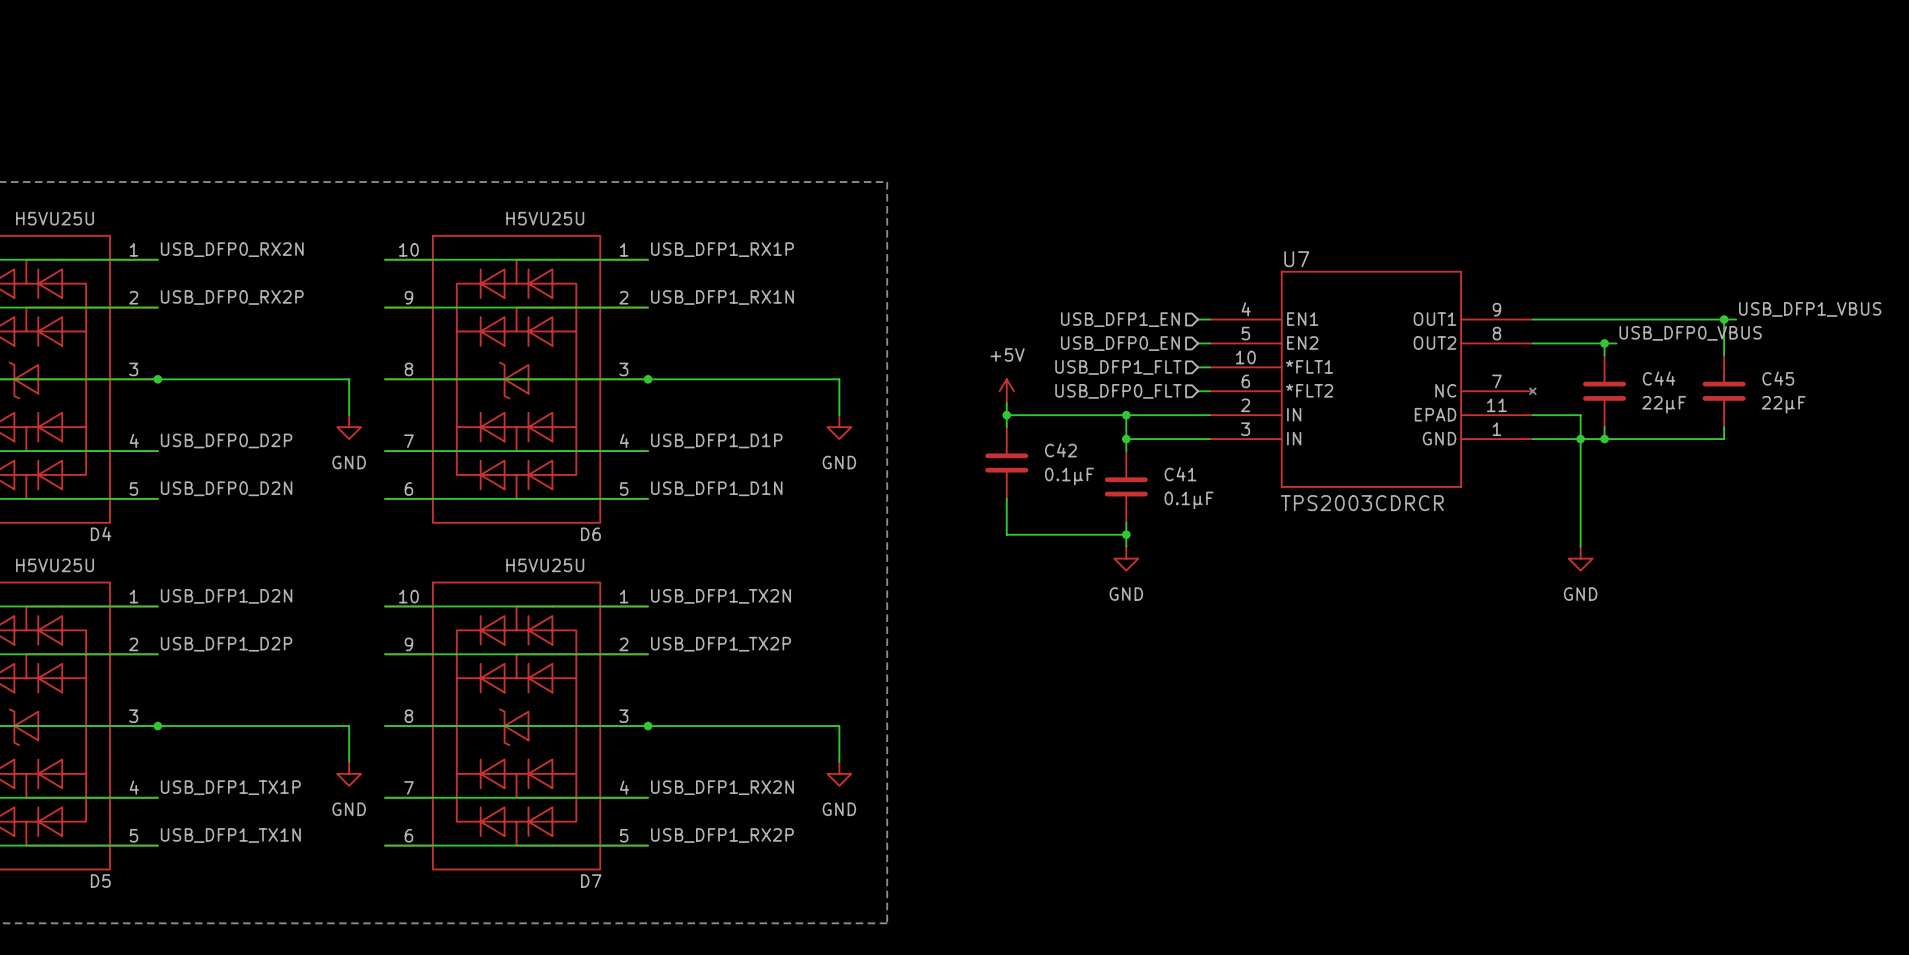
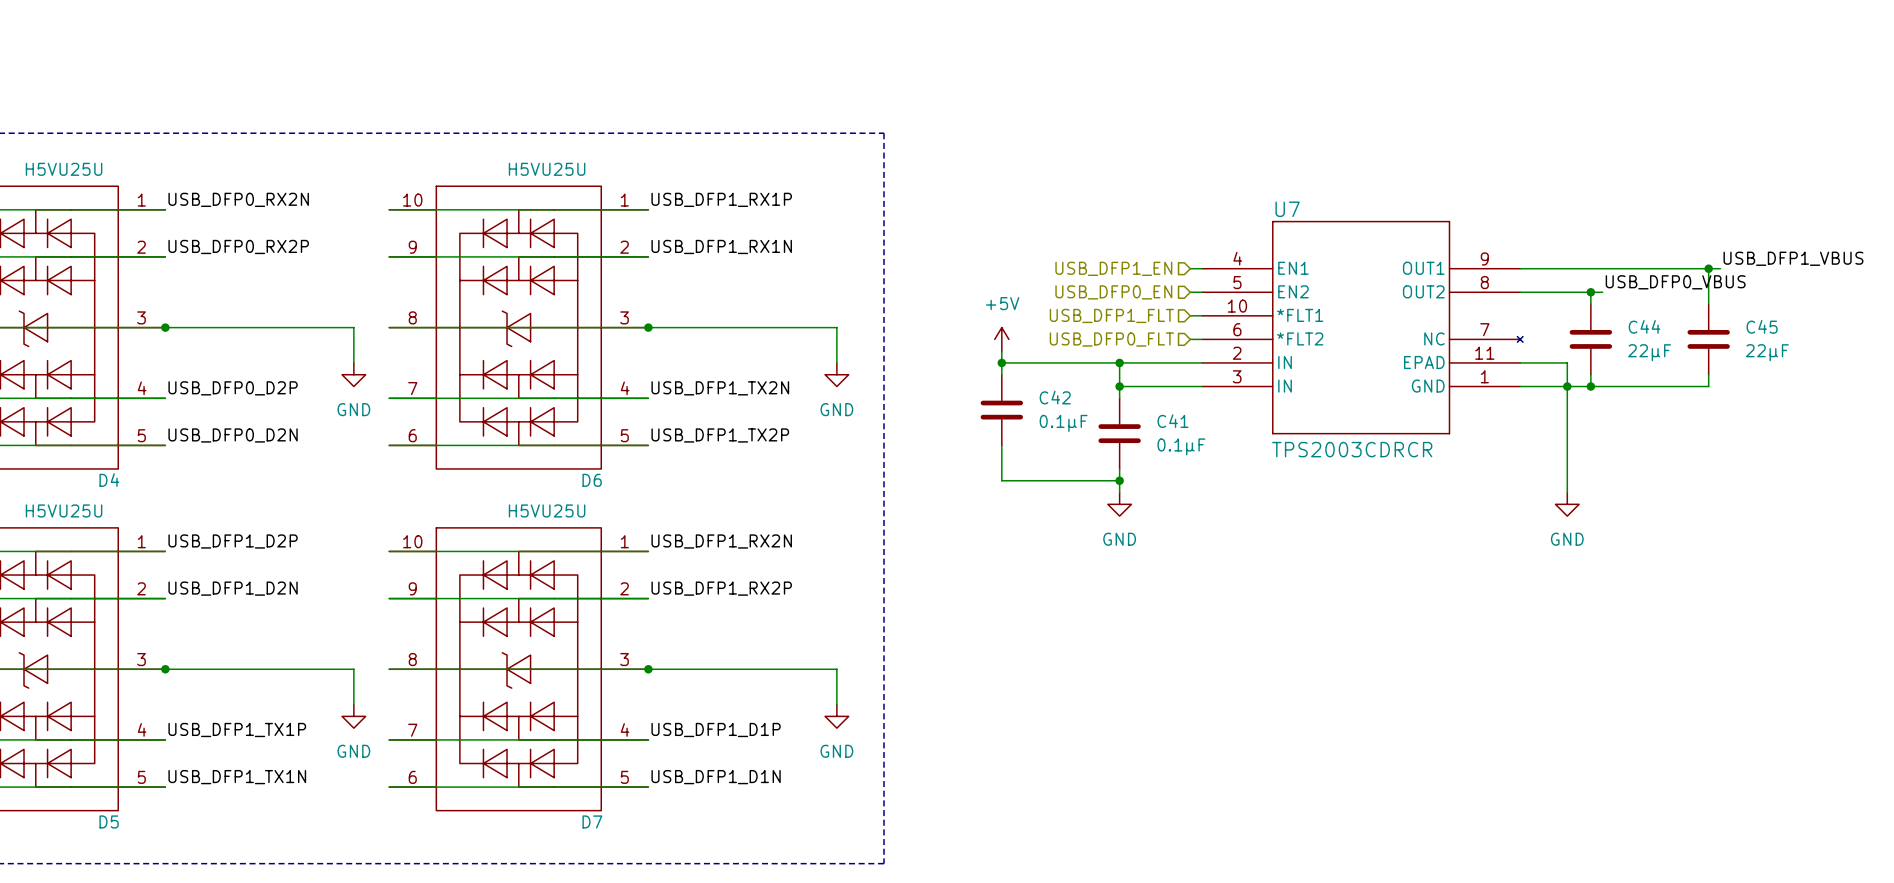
label: USB_DFP1_D1P (716, 440) -> USB_DFP1_TX2N (720, 388)
label: USB_DFP1_D1N (716, 488) -> USB_DFP1_TX2P (720, 435)
label: USB_DFP1_D2N (226, 596) -> USB_DFP1_D2P (233, 541)
label: USB_DFP1_TX2N (721, 596) -> USB_DFP1_RX2N (721, 541)
label: USB_DFP1_D2P (226, 644) -> USB_DFP1_D2N (233, 588)
label: USB_DFP1_TX2P (721, 644) -> USB_DFP1_RX2P (721, 588)
label: USB_DFP1_RX2N (722, 787) -> USB_DFP1_D1P (716, 729)
label: USB_DFP1_RX2P (722, 835) -> USB_DFP1_D1N (716, 777)

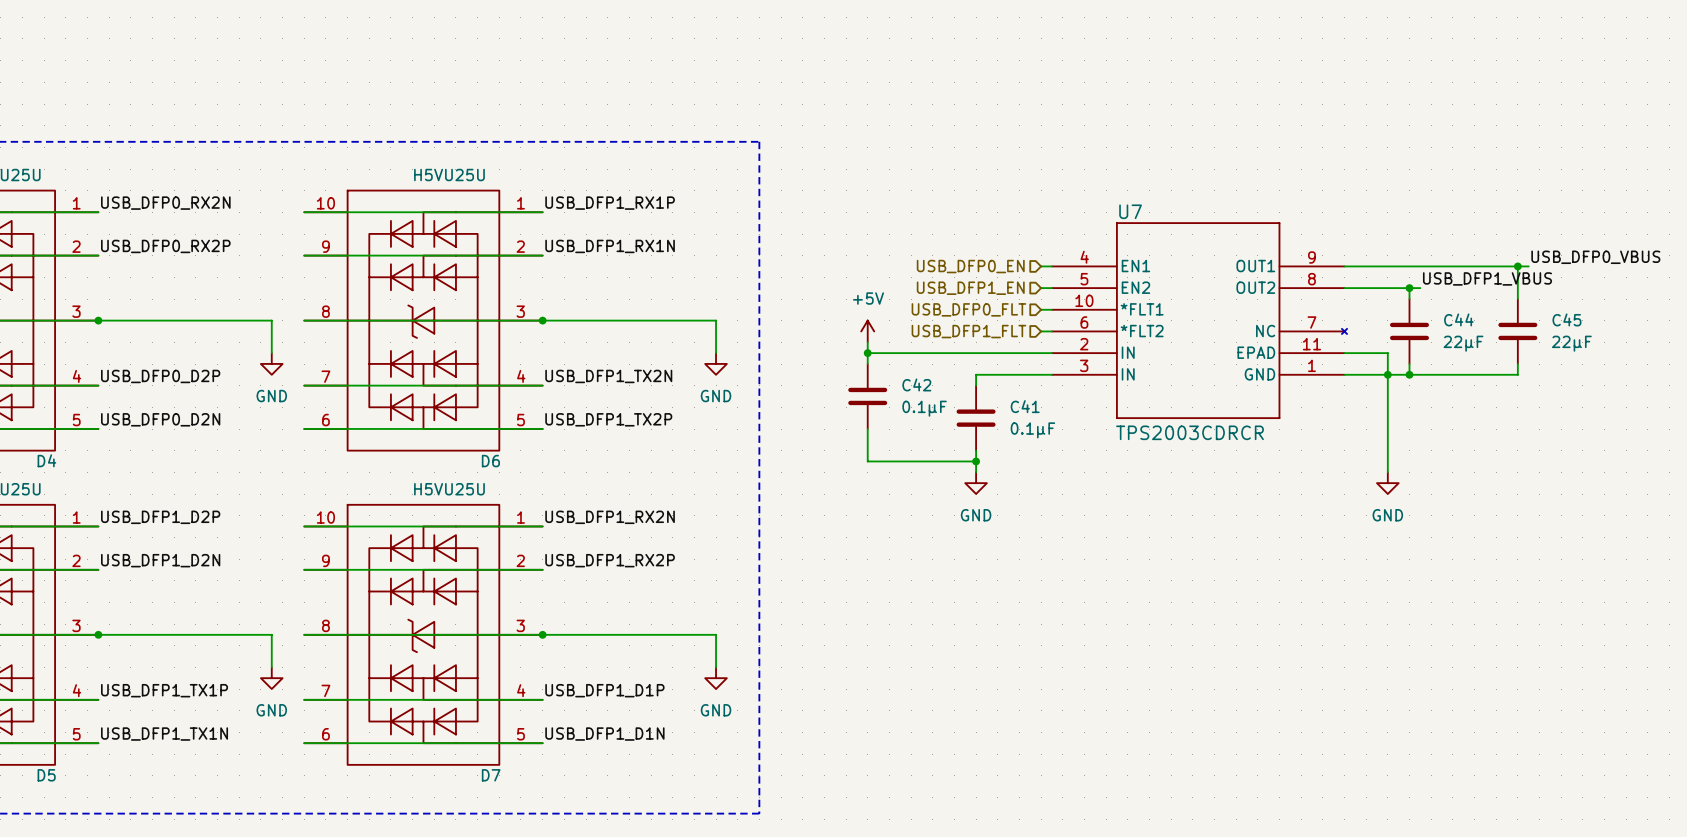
label: USB_DFP1_VBUS (1793, 258) -> USB_DFP0_VBUS (1595, 257)
hierarchical label: USB_DFP1_EN (1113, 268) -> USB_DFP0_EN (970, 266)
label: USB_DFP0_VBUS (1675, 282) -> USB_DFP1_VBUS (1487, 278)
hierarchical label: USB_DFP0_EN (1113, 292) -> USB_DFP1_EN (970, 288)
hierarchical label: USB_DFP1_FLT (1111, 315) -> USB_DFP0_FLT (968, 309)
hierarchical label: USB_DFP0_FLT (1111, 339) -> USB_DFP1_FLT (968, 331)
wire: (1119, 362) (1119, 386) -> none
junction: (1119, 362) -> none
junction: (1119, 386) -> none

